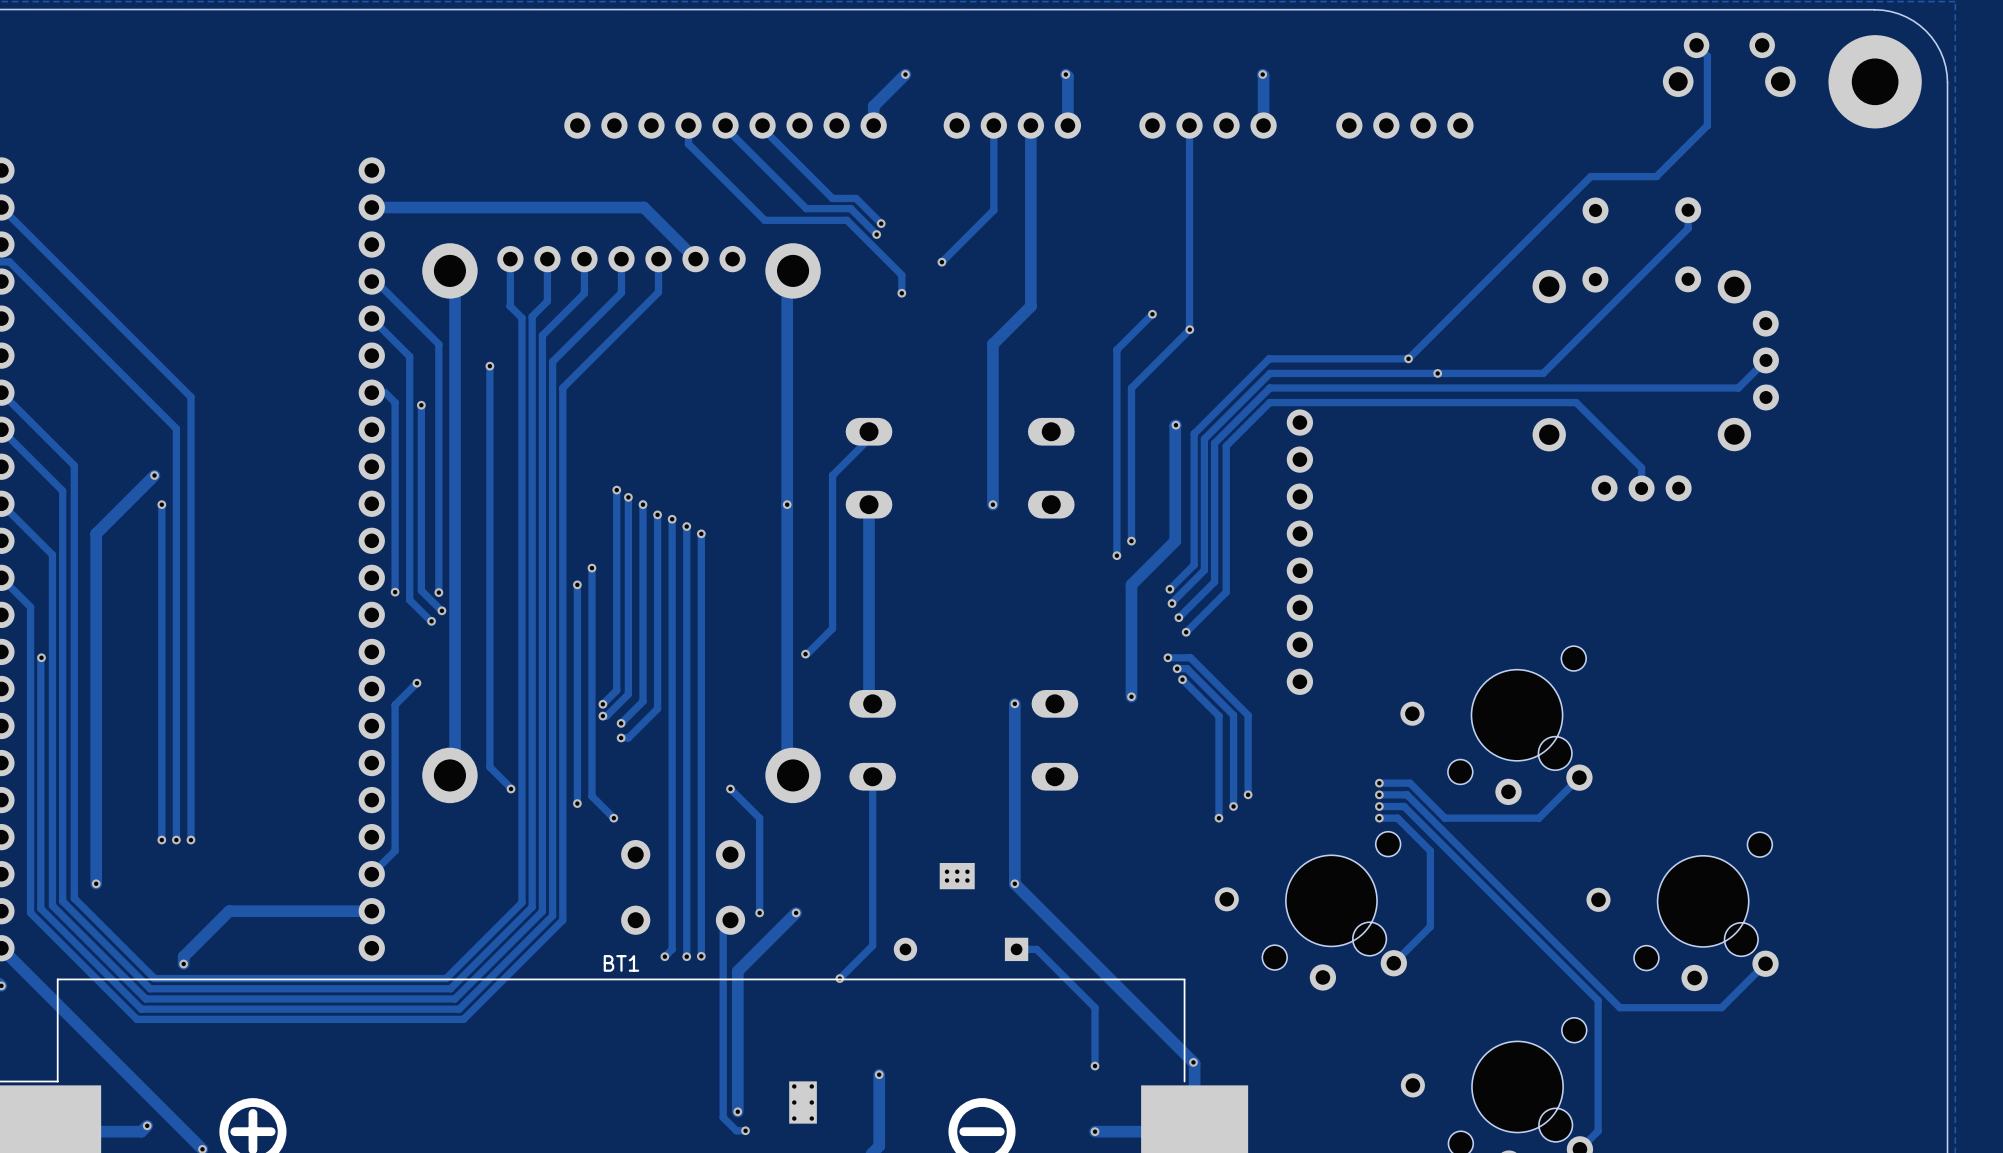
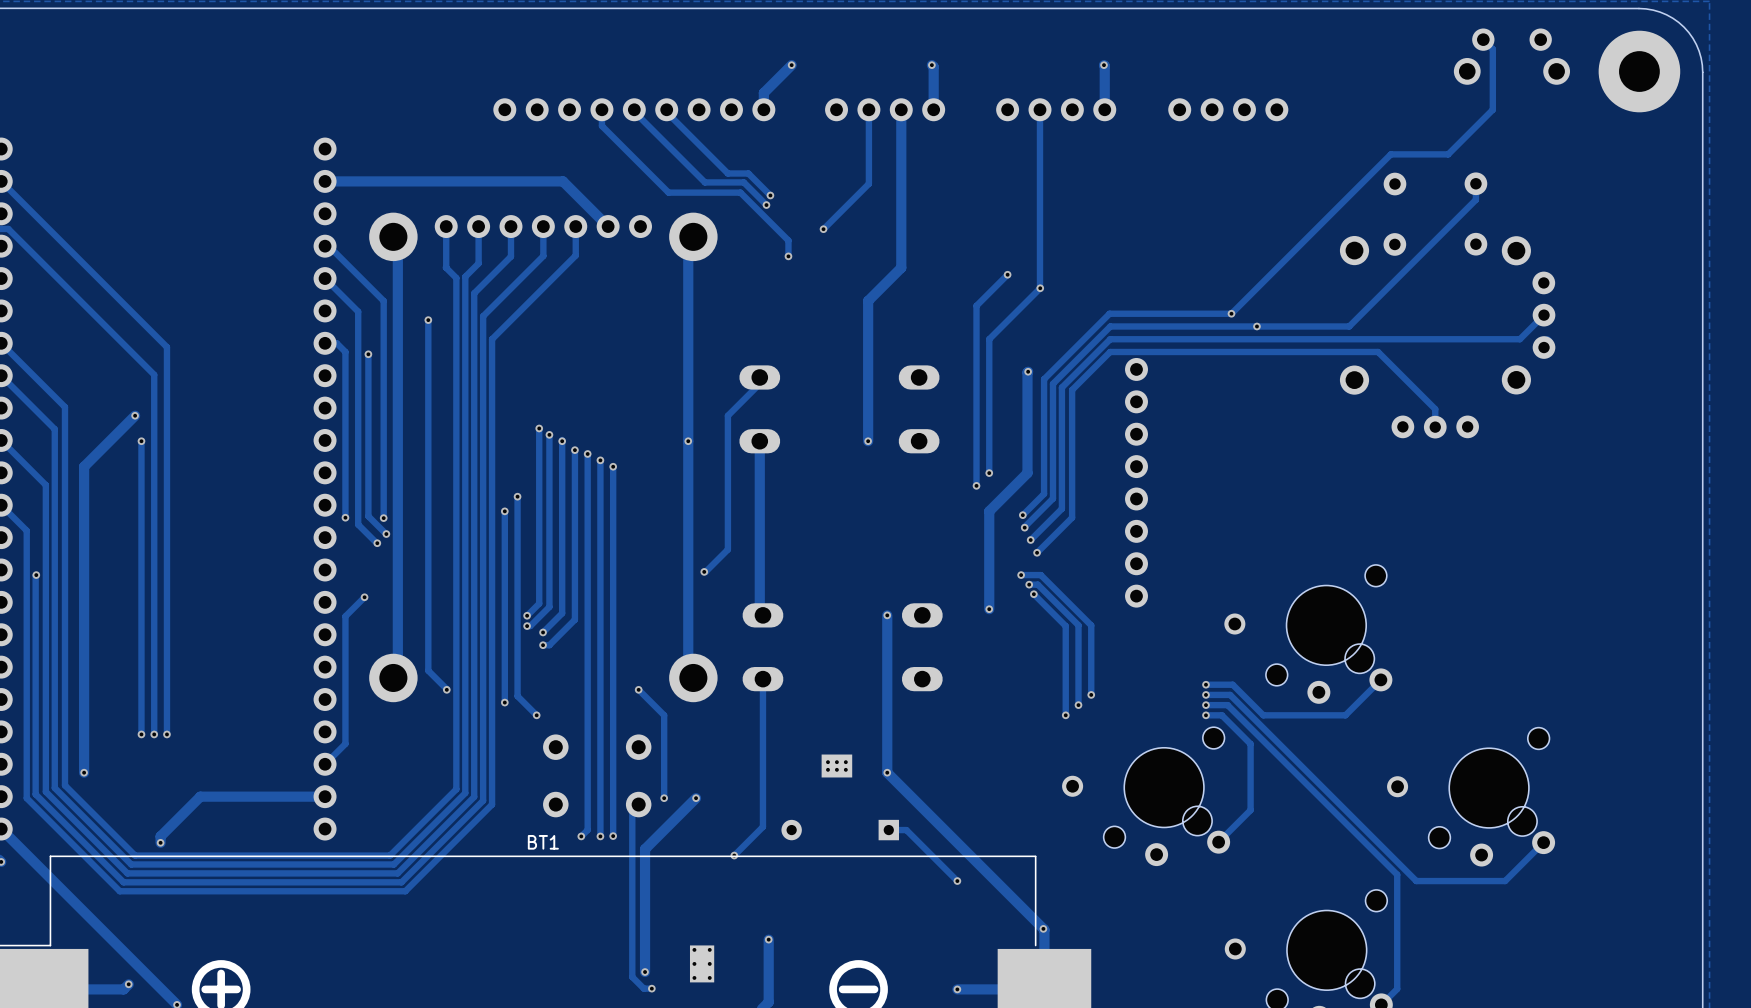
track: (1095, 1007) (1095, 1066) -> none
via position: (1095, 1066) -> (957, 881)

